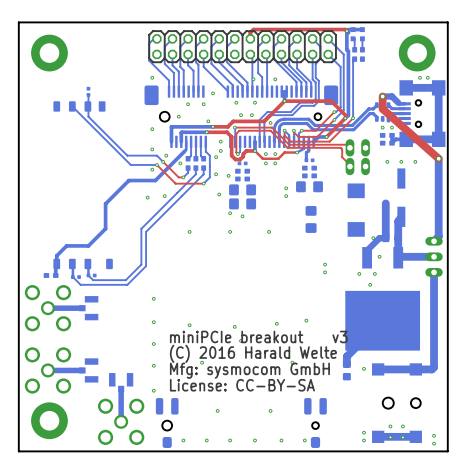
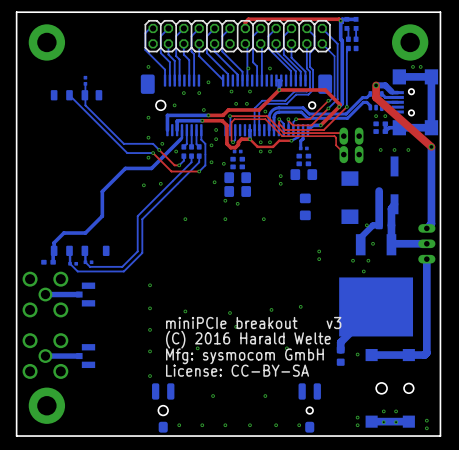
part: (121, 382) -> none
bottom track: (121, 388) (121, 421) -> none
part: (121, 421) -> none

